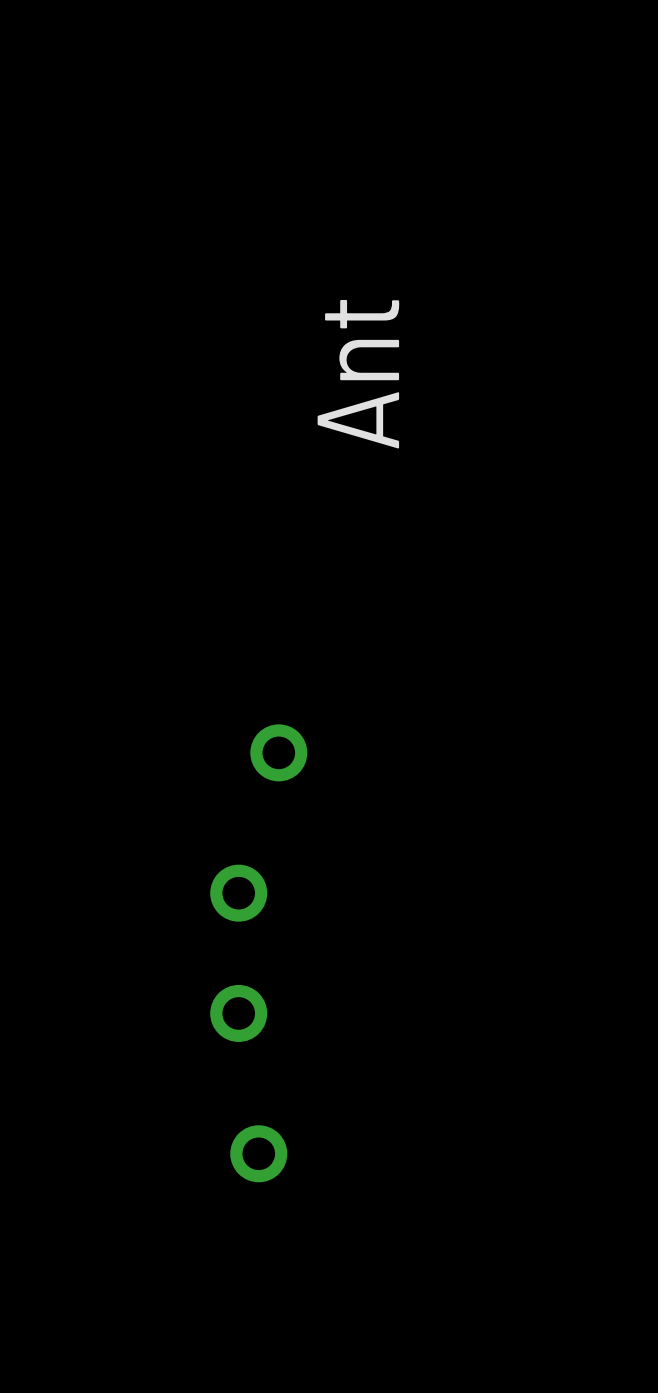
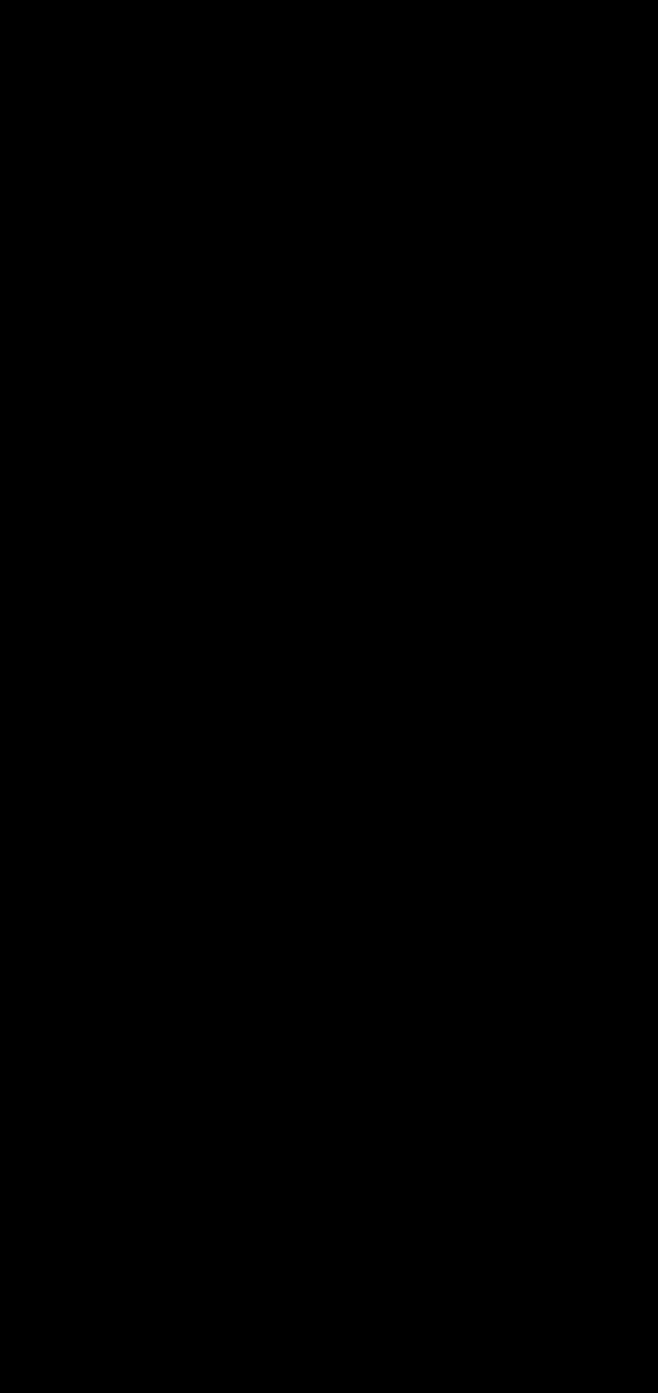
text: Ant (358, 374) -> none
via: (278, 752) -> none
via: (238, 893) -> none
via: (238, 1013) -> none
via: (258, 1153) -> none

